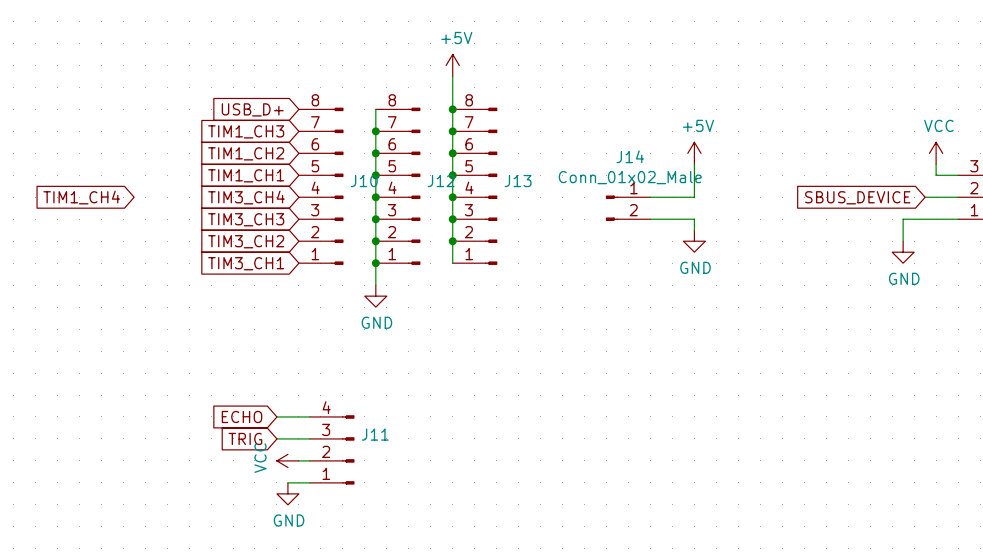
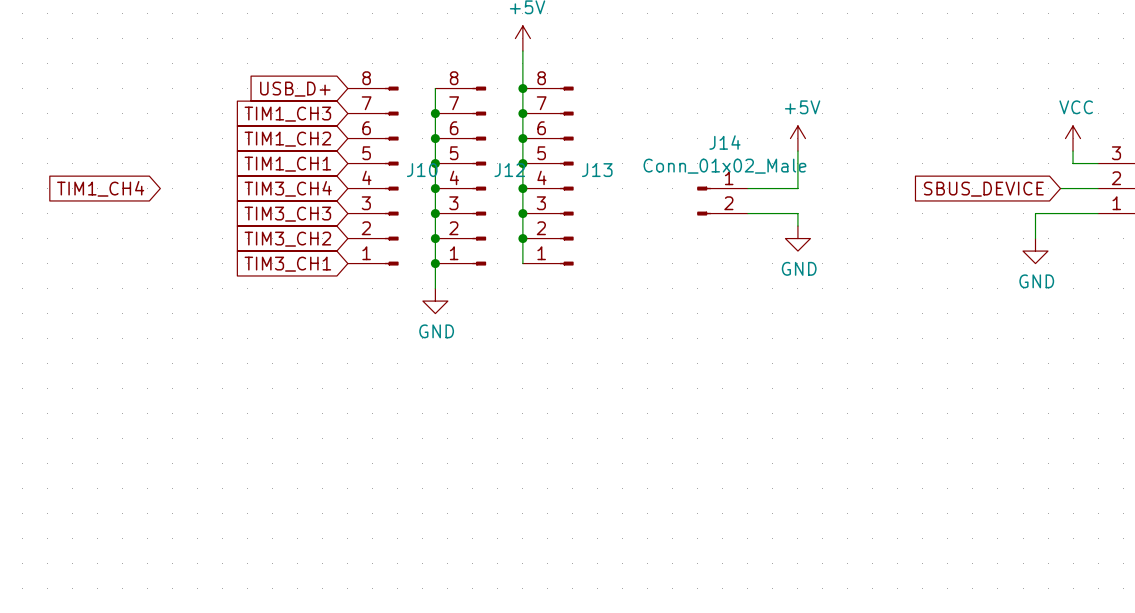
global label: ECHO (242, 416) -> none
wire: (276, 416) (309, 416) -> none
global label: TRIG (245, 438) -> none
wire: (276, 438) (309, 438) -> none
J11: (332, 449) -> none
power symbol: VCC (287, 460) -> none
wire: (298, 460) (309, 460) -> none
wire: (287, 482) (309, 482) -> none
power symbol: GND (287, 493) -> none

